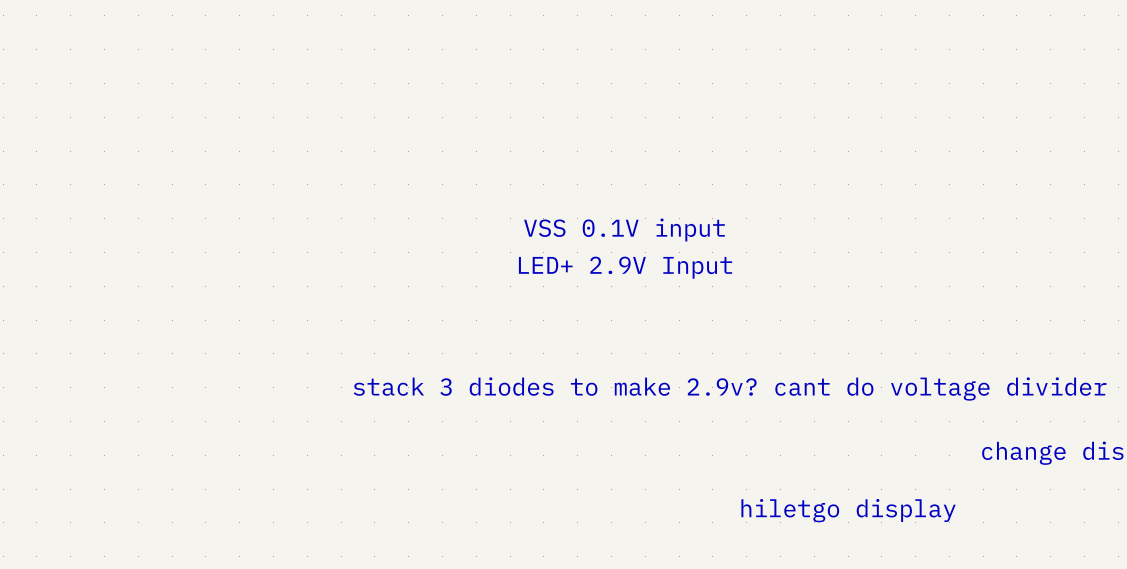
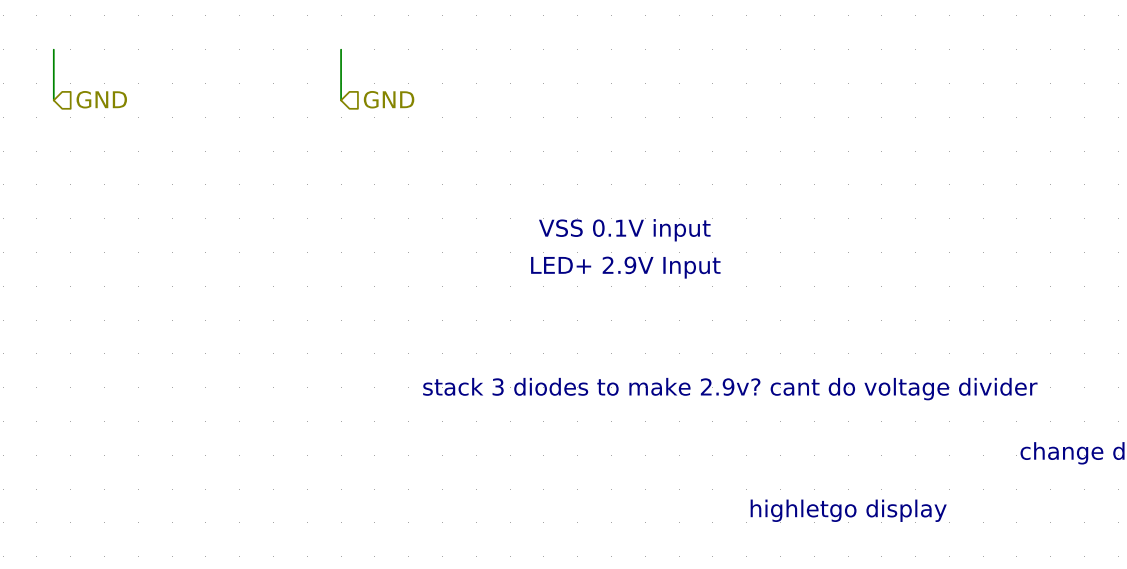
wire: none -> (53, 49) (53, 100)
wire: none -> (341, 49) (341, 100)
hierarchical label: none -> GND (101, 99)
hierarchical label: none -> GND (389, 99)
text: hiletgo display (848, 510) -> highletgo display (848, 510)

